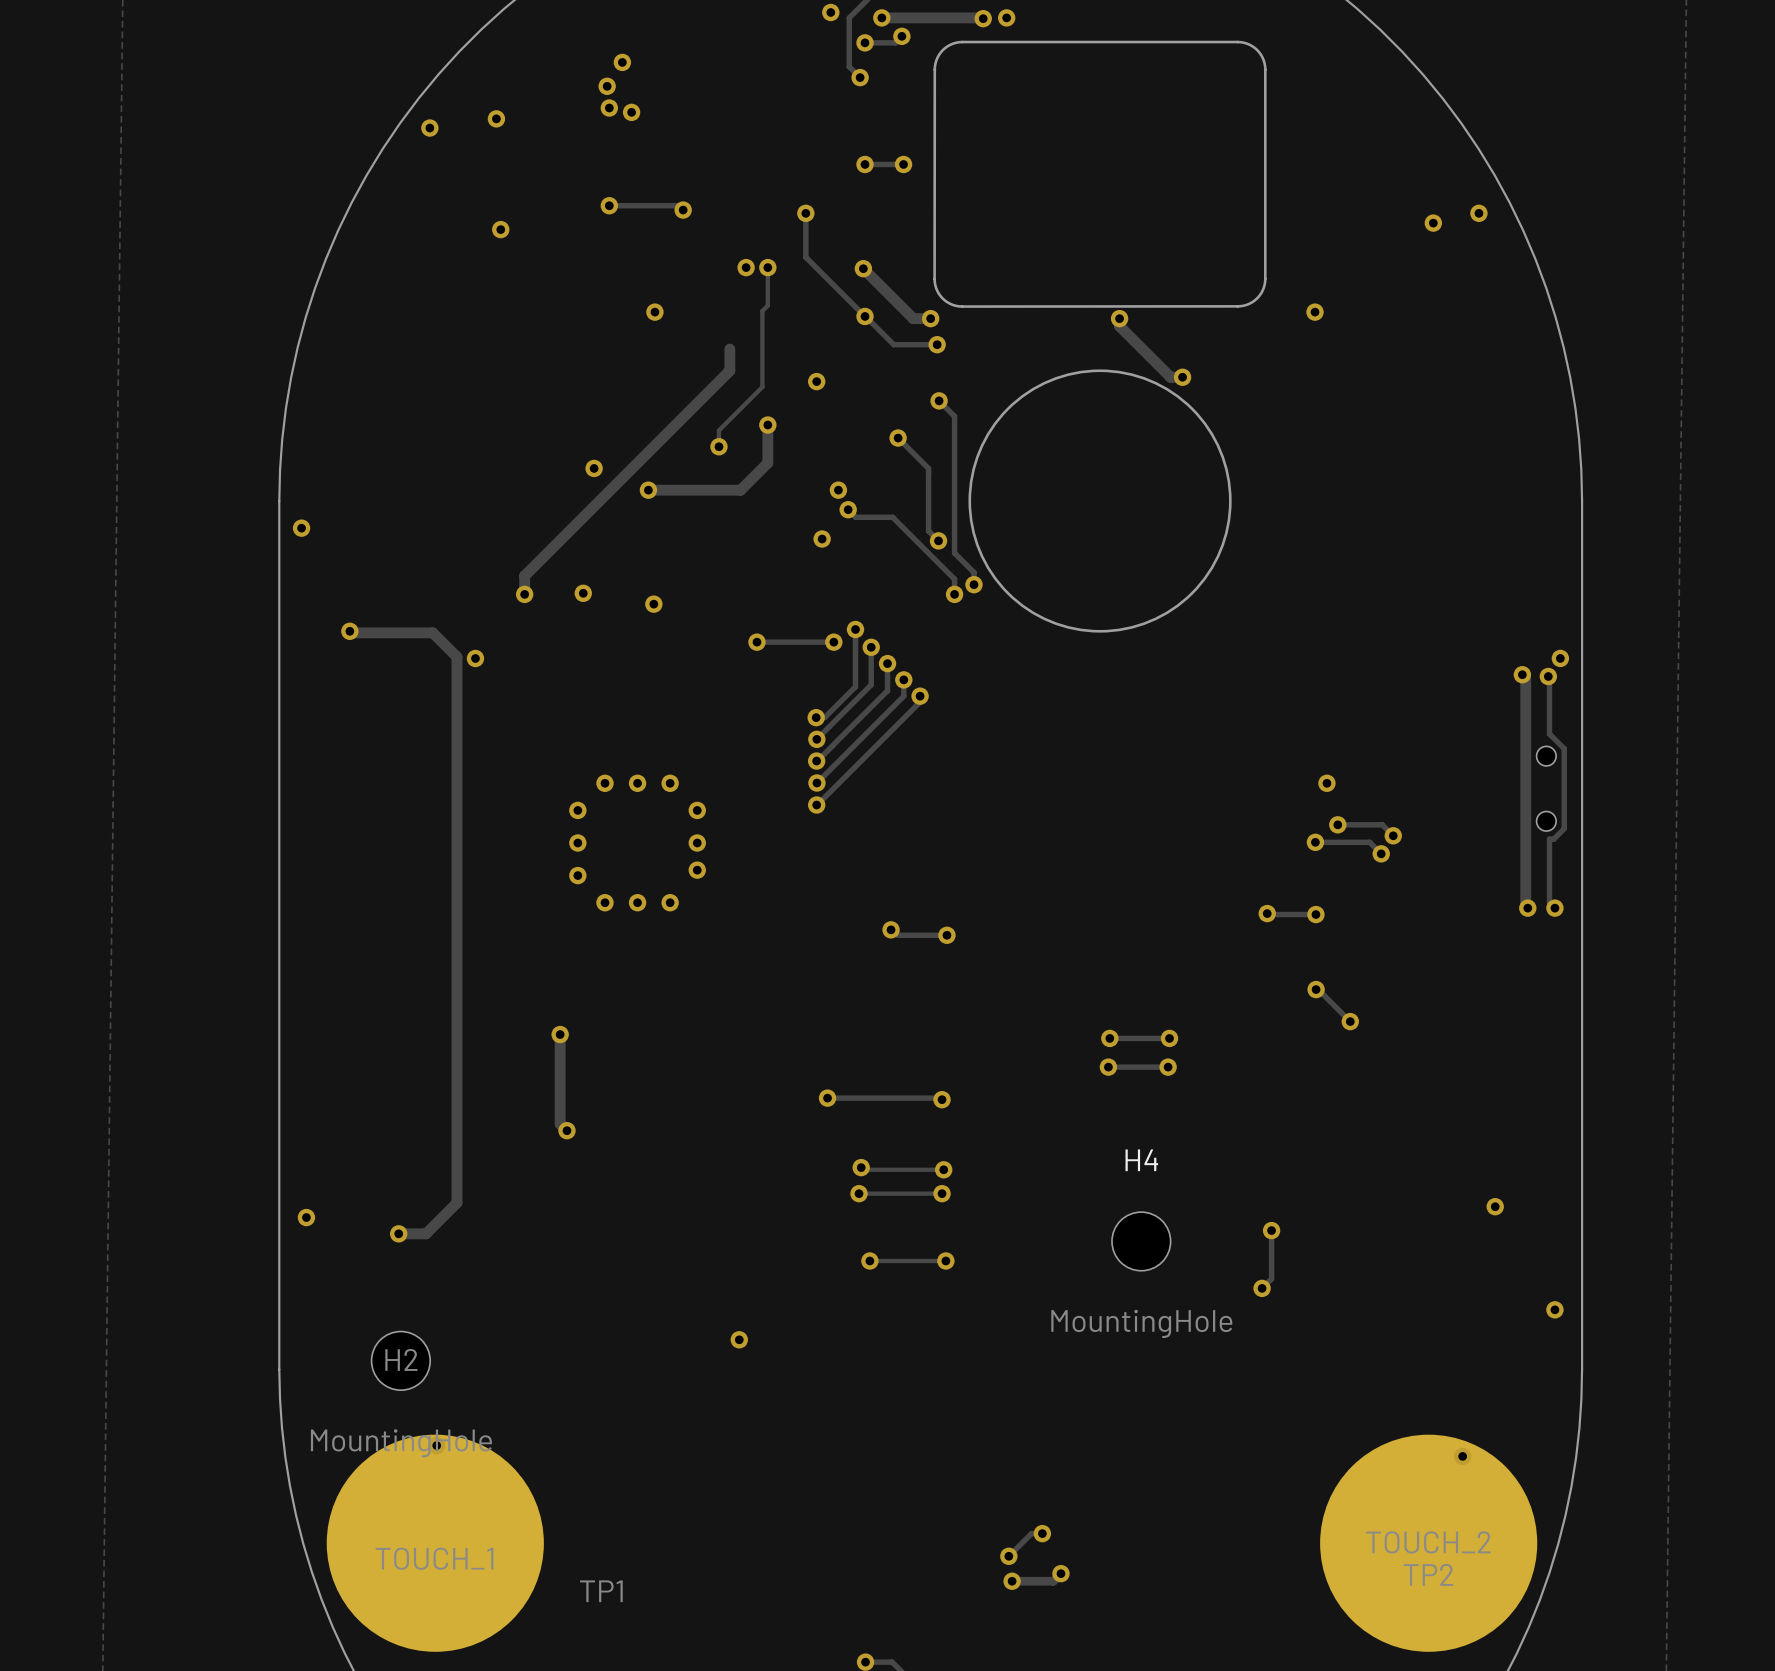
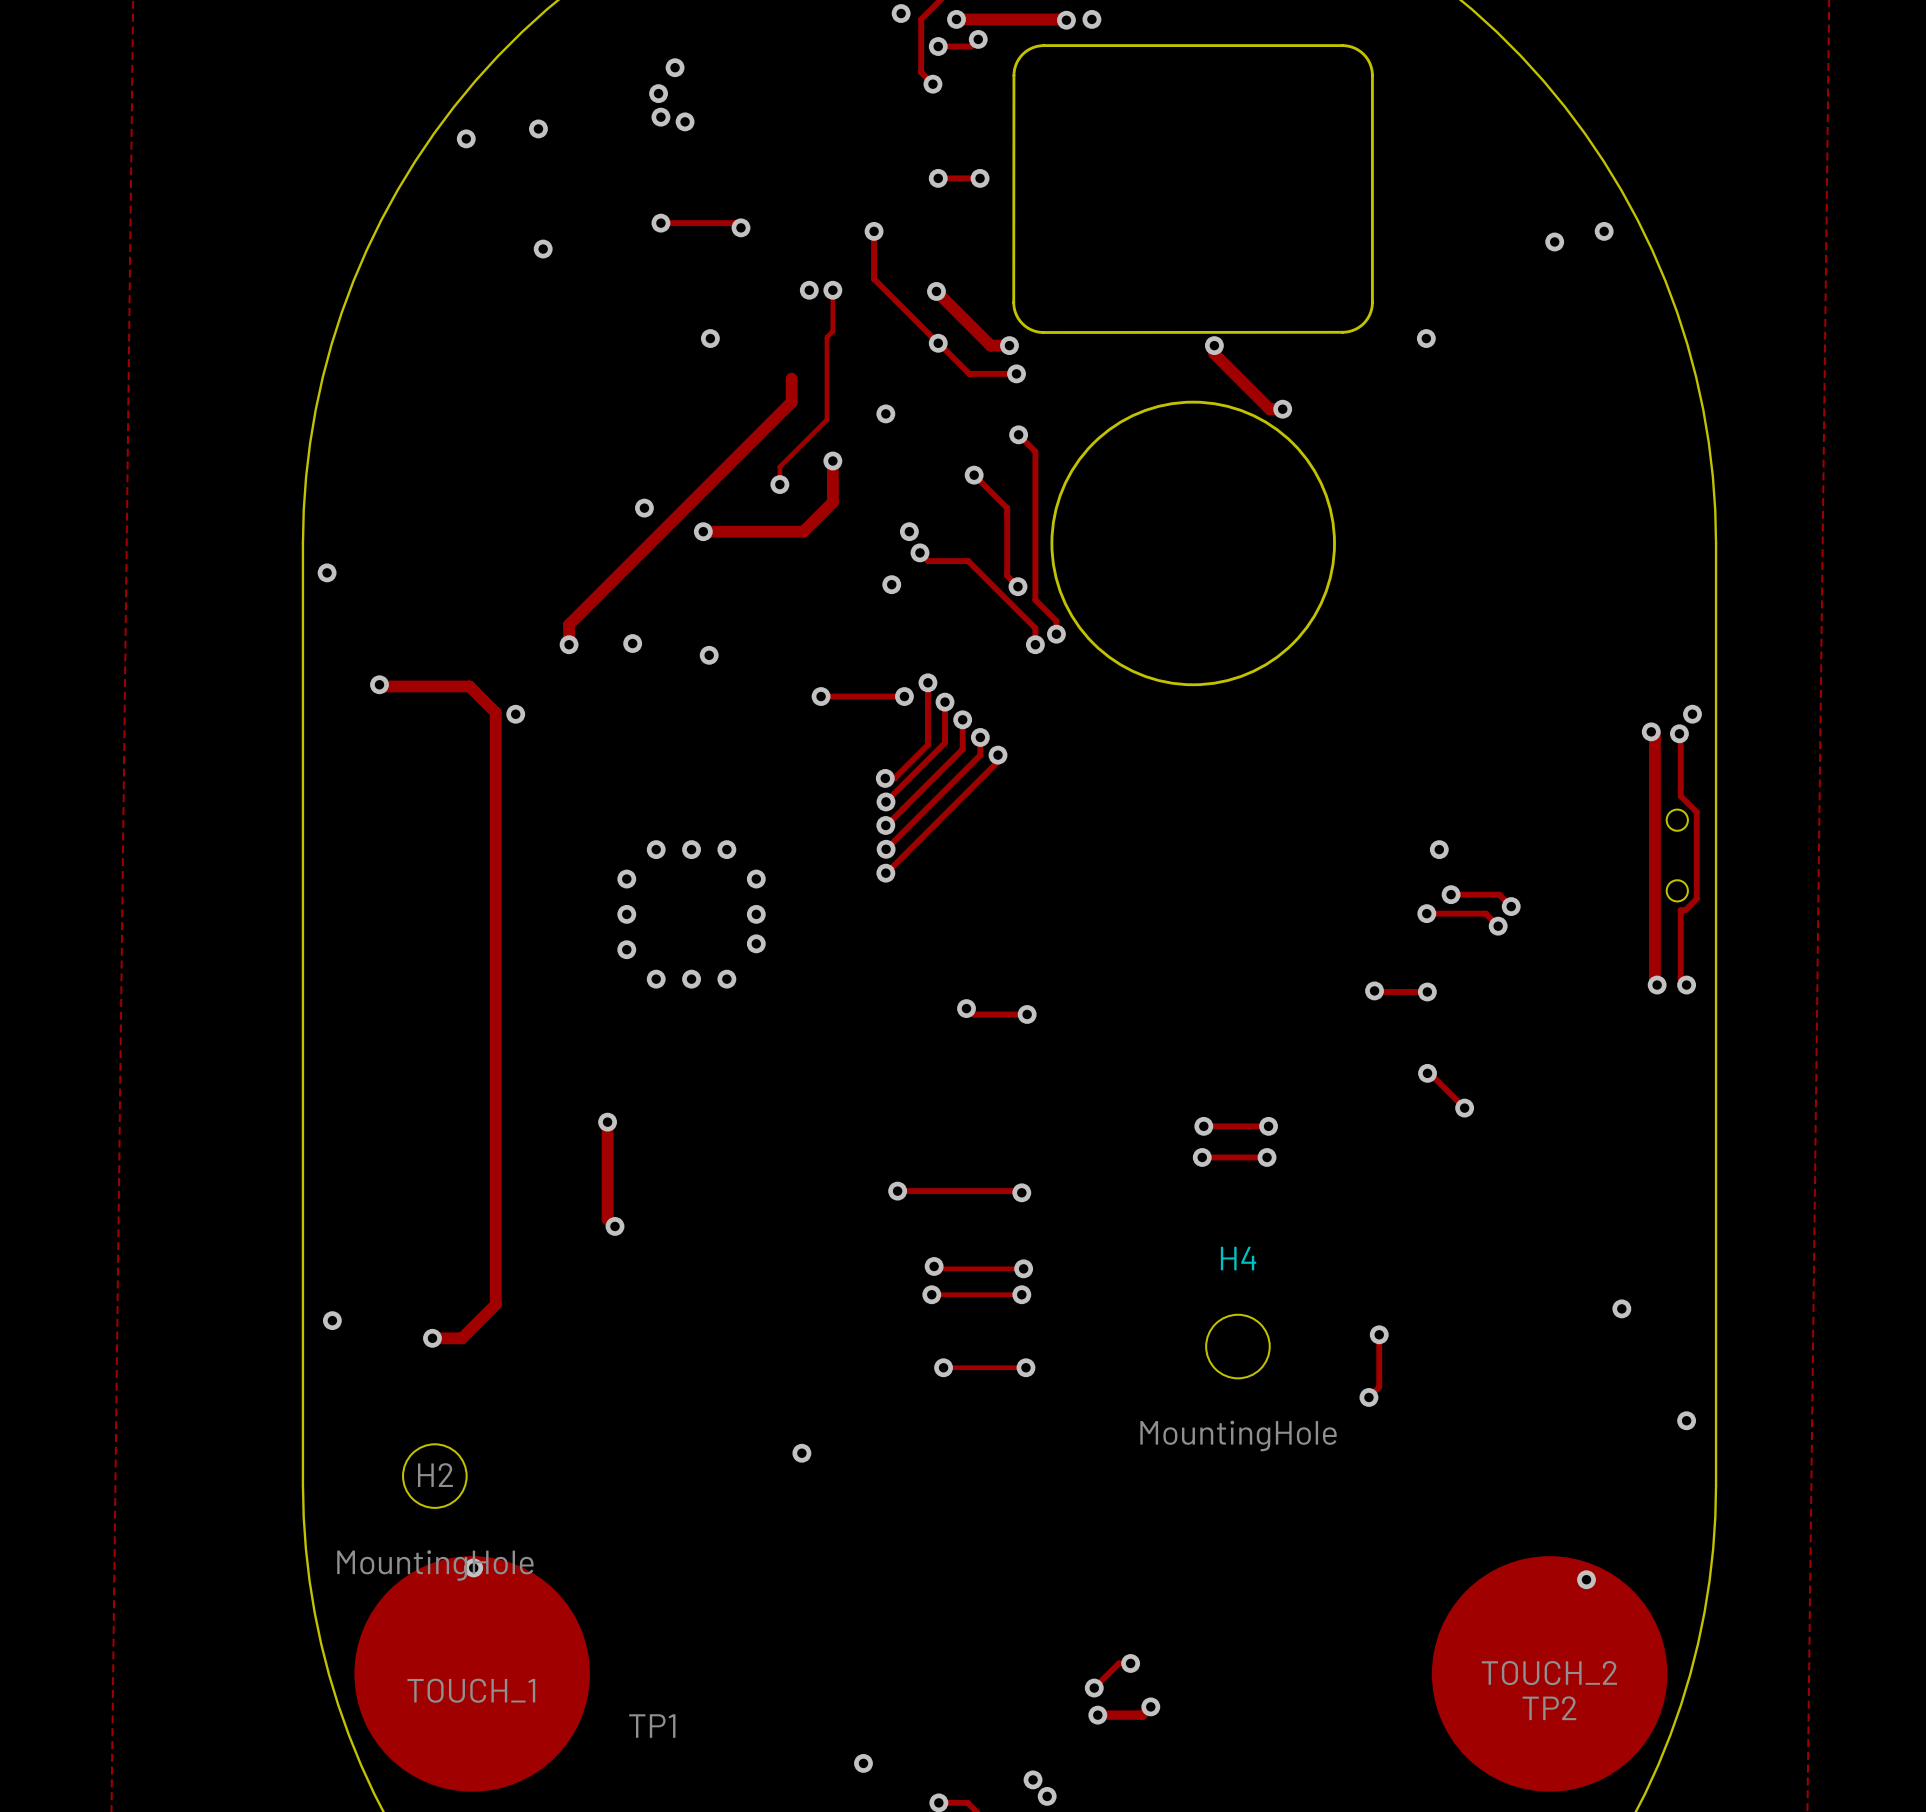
via: none -> (863, 1763)
via: none -> (1033, 1779)
via: none -> (1047, 1796)

